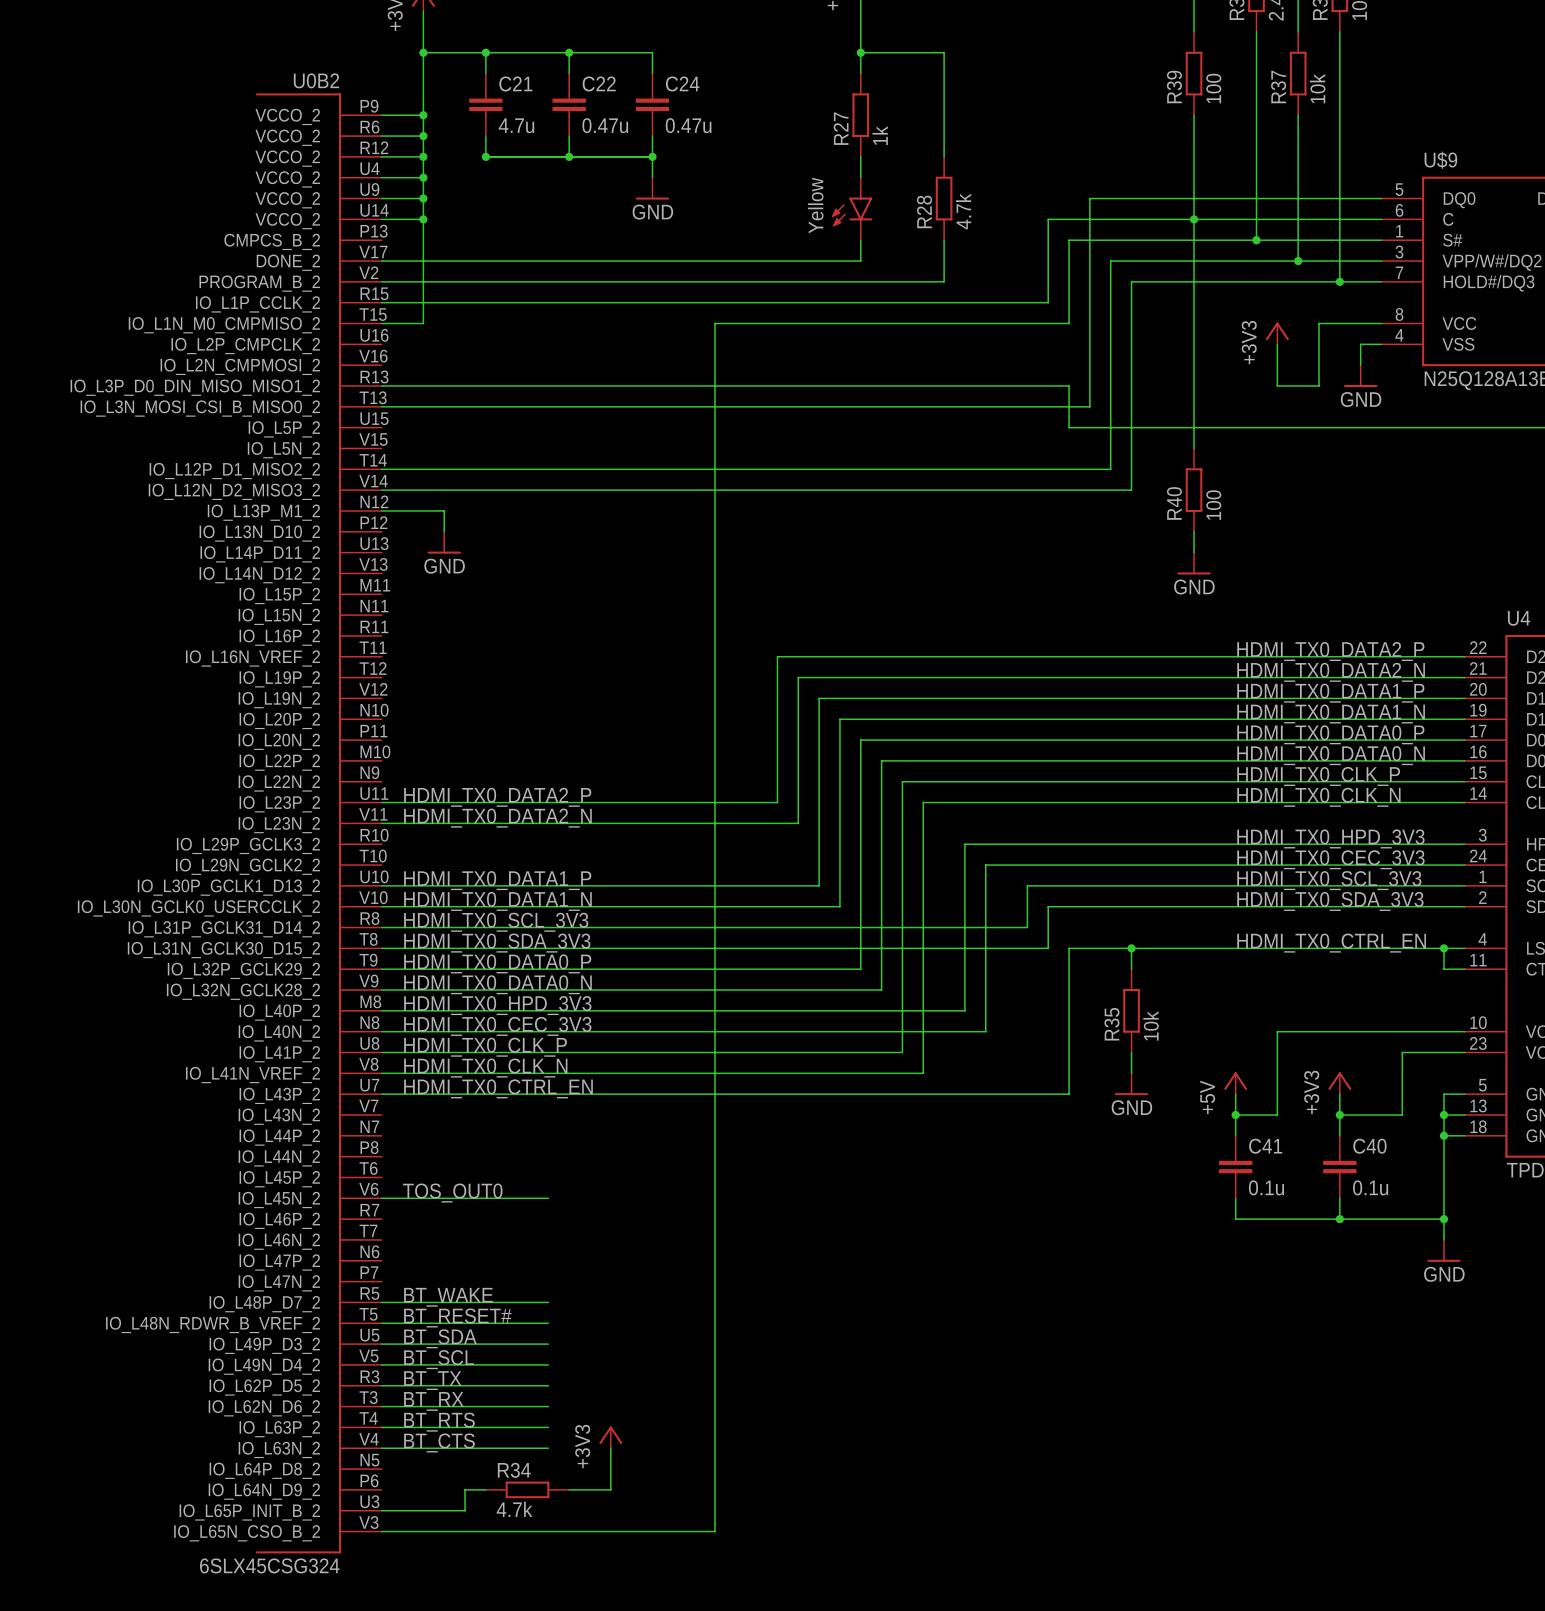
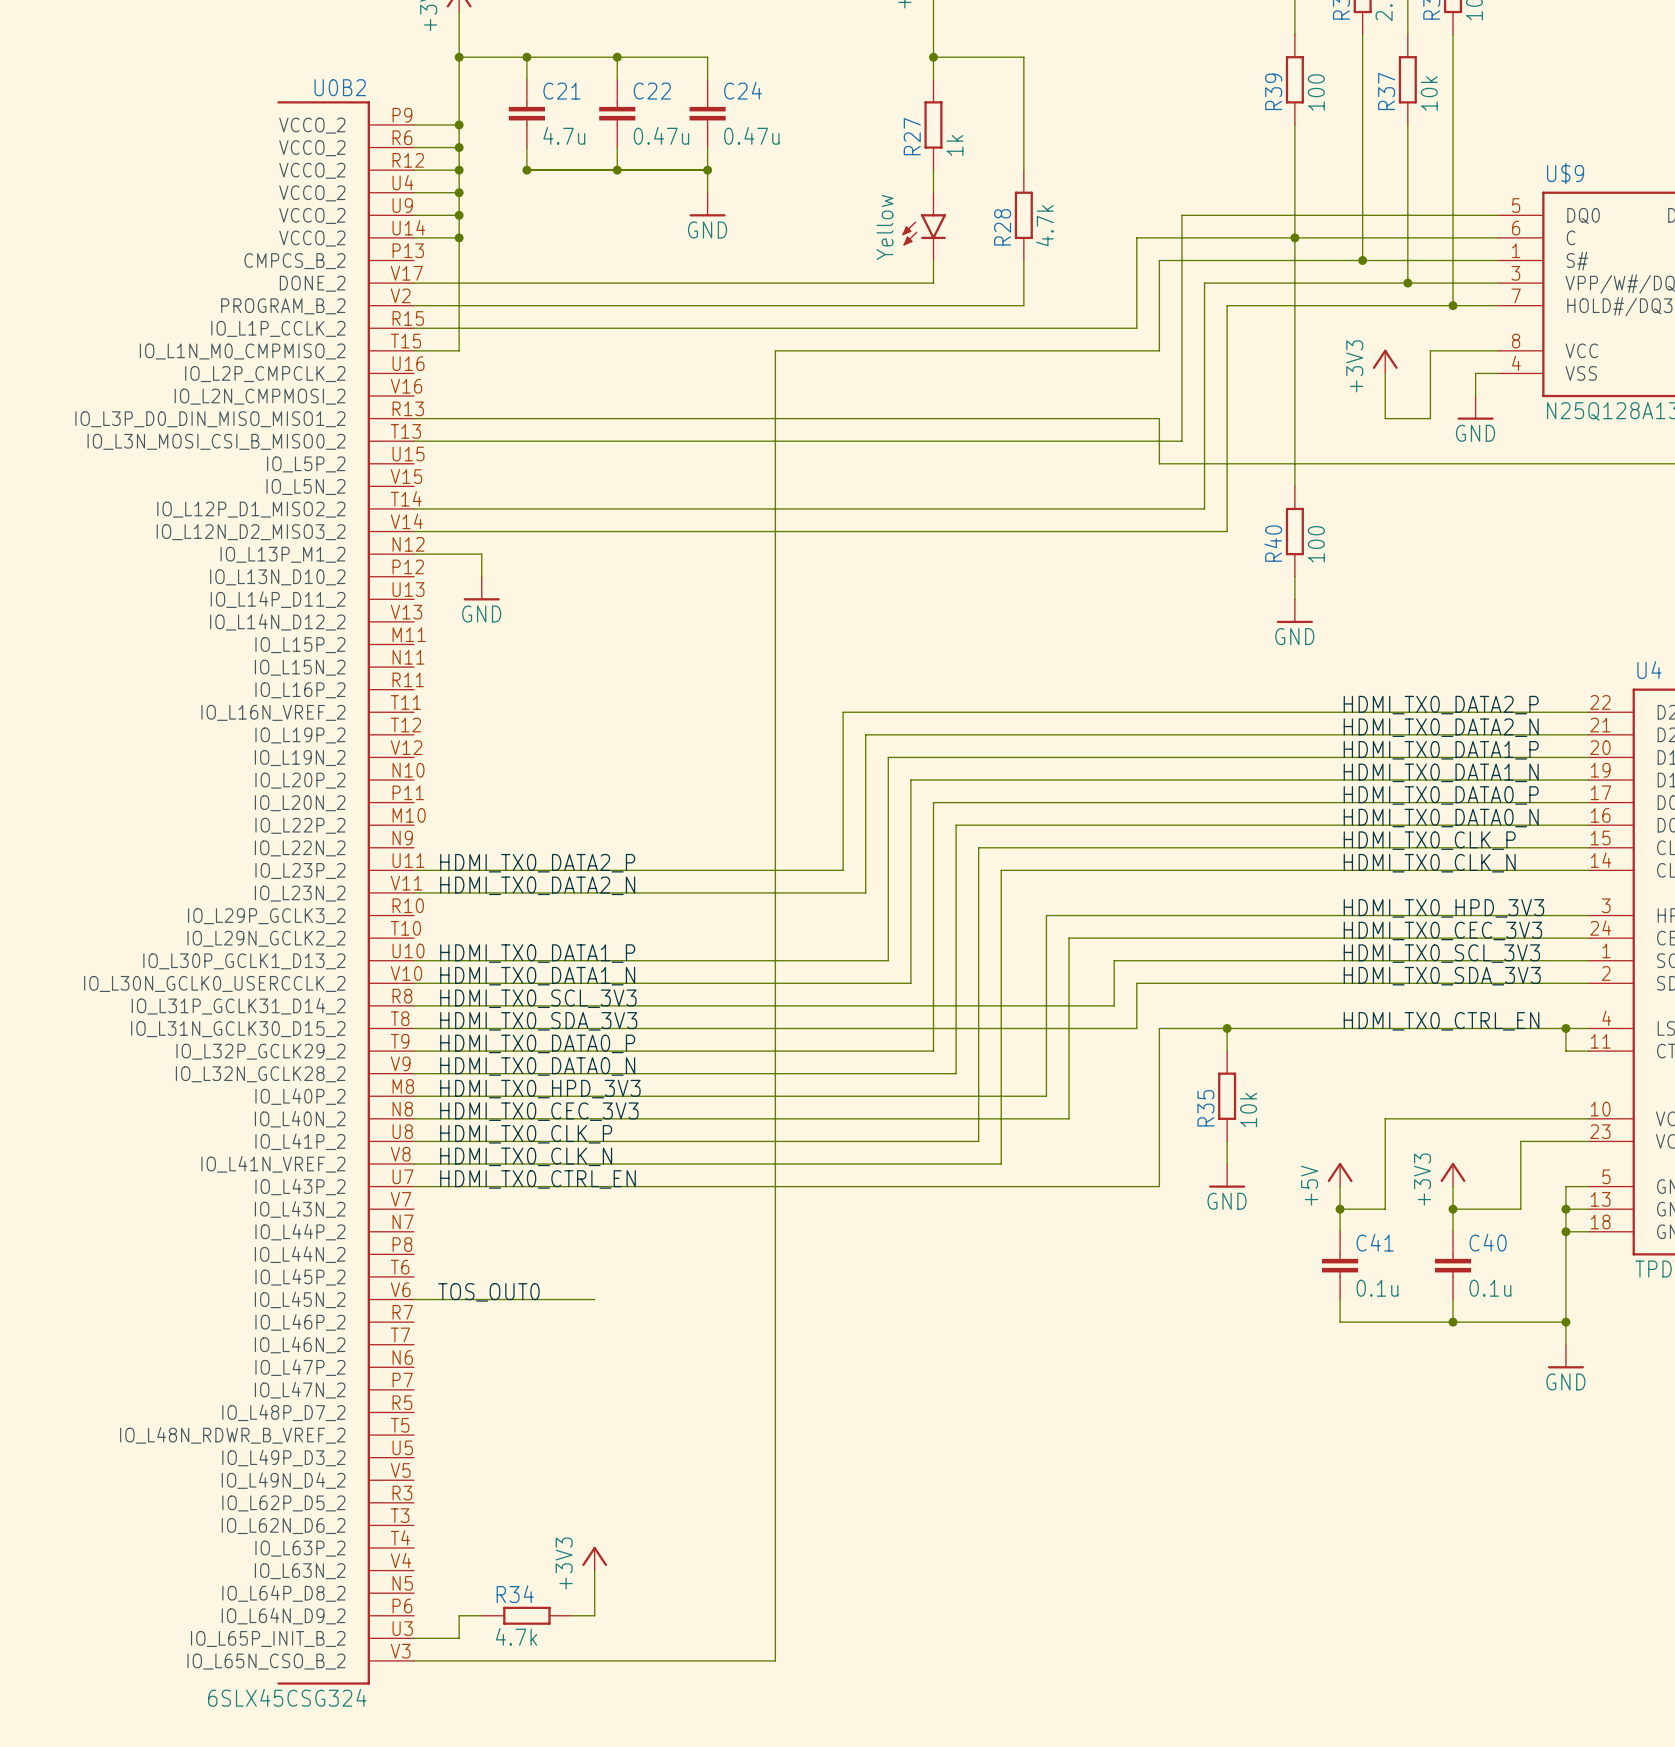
label: BT_WAKE (448, 1297) -> none
wire: (381, 1302) (548, 1302) -> none
label: BT_RESET# (457, 1317) -> none
wire: (381, 1323) (548, 1323) -> none
label: BT_SDA (440, 1338) -> none
wire: (381, 1344) (548, 1344) -> none
label: BT_SCL (439, 1359) -> none
wire: (381, 1364) (548, 1364) -> none
label: BT_TX (432, 1380) -> none
wire: (381, 1385) (548, 1385) -> none
label: BT_RX (433, 1401) -> none
wire: (381, 1406) (548, 1406) -> none
label: BT_RTS (439, 1422) -> none
wire: (381, 1427) (548, 1427) -> none
power symbol position: +3V3 (610, 1437) -> +3V3 (594, 1558)
label: BT_CTS (439, 1442) -> none
wire: (381, 1448) (548, 1448) -> (572, 1615) (594, 1615) (594, 1570)
wire: (610, 1448) (610, 1489) (569, 1489) -> none
wire: (485, 1489) (465, 1489) (465, 1510) (423, 1510) -> (481, 1615) (459, 1615) (459, 1638)
R34 position: (527, 1489) -> (526, 1615)

